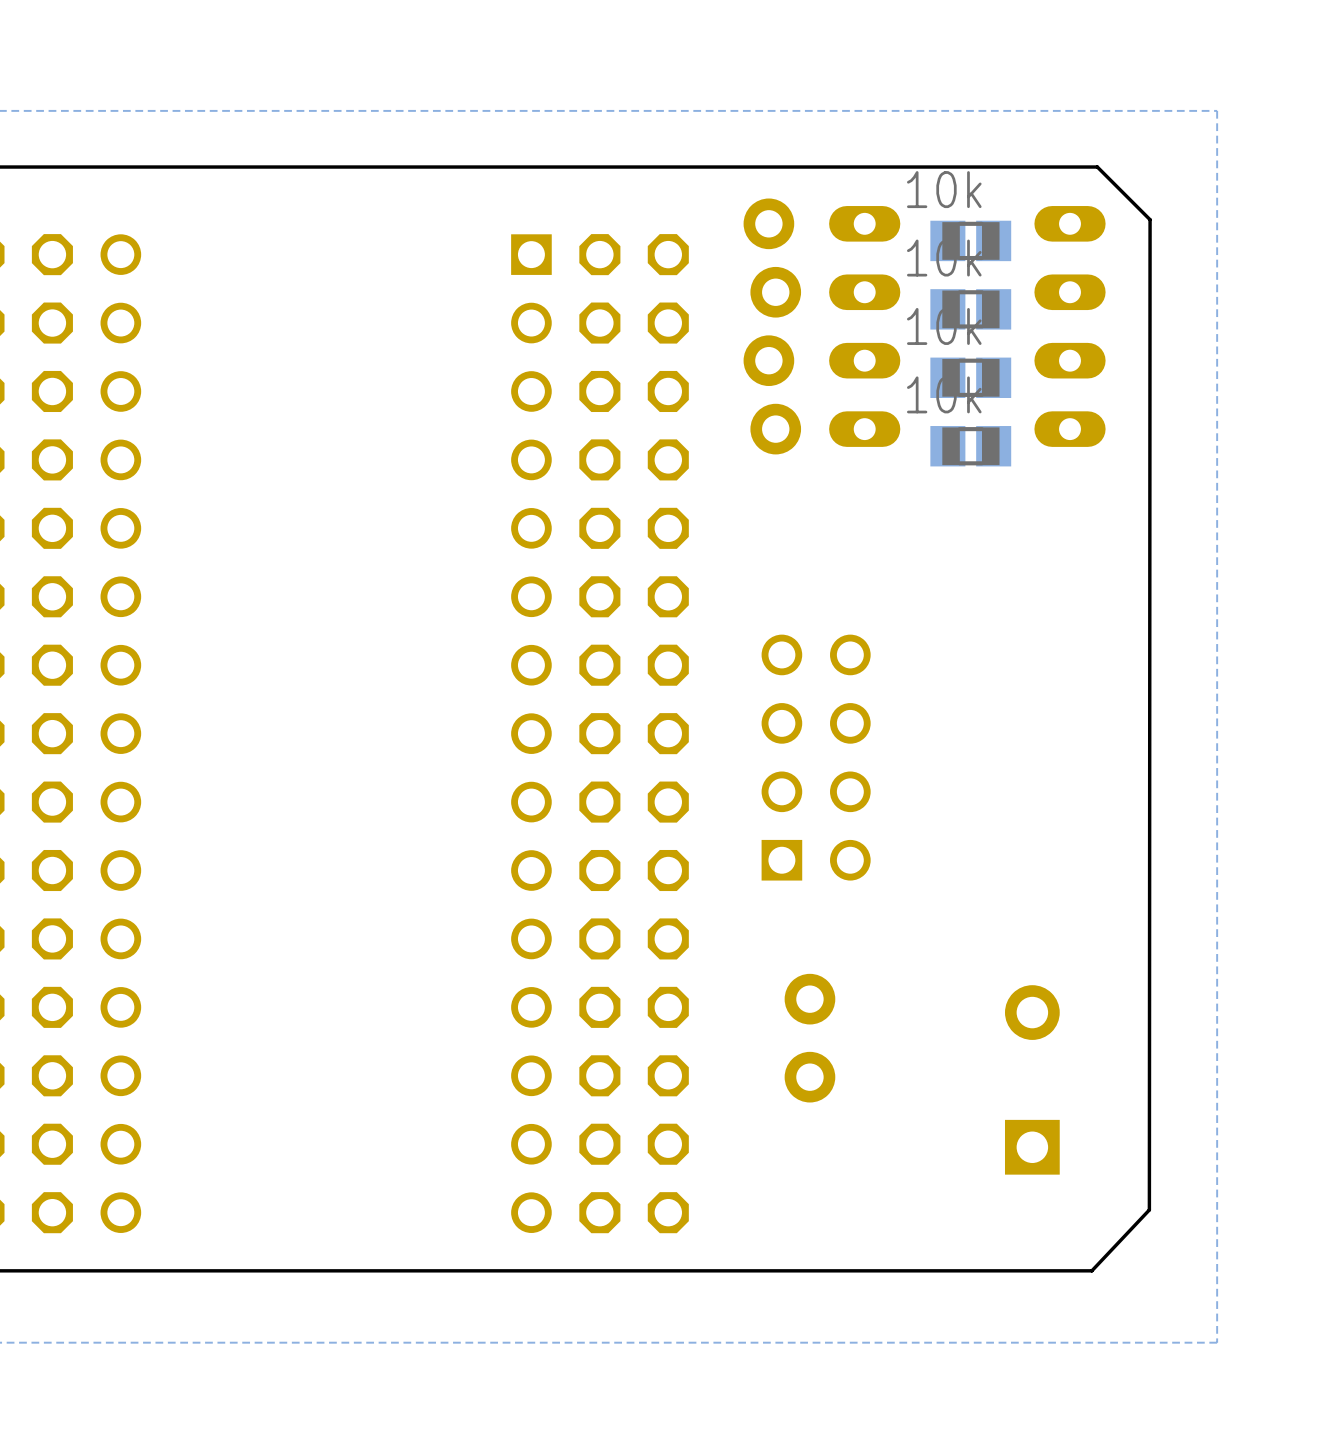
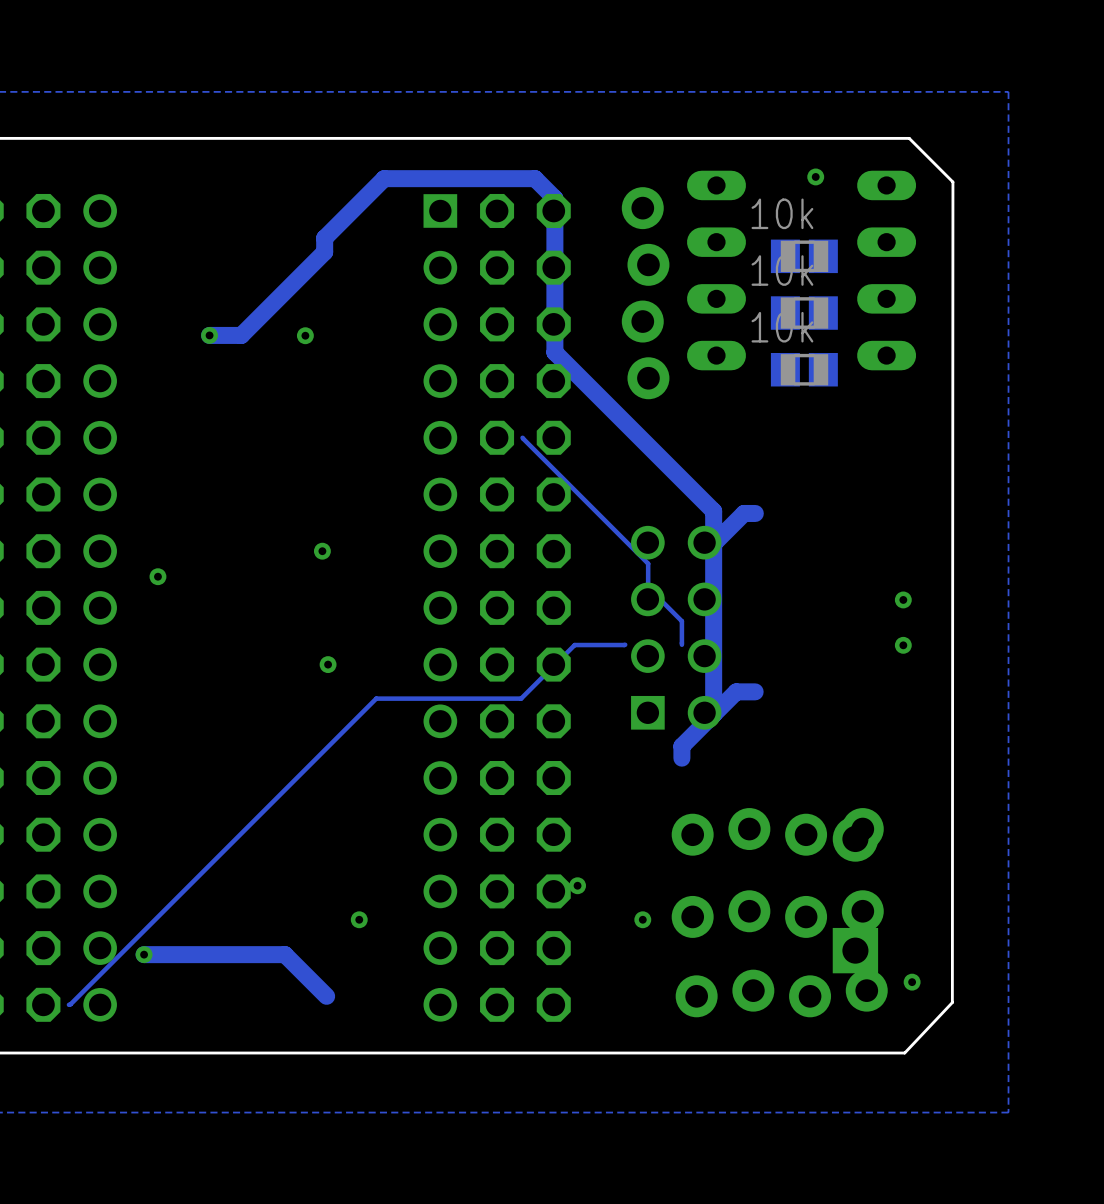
via: none -> (815, 176)
part: 10k (970, 240) -> none
part position: (772, 326) -> (645, 293)
track: none -> (209, 335) (241, 335) (324, 252) (324, 238) (384, 178) (535, 178) (554, 198) (554, 352) (713, 511) (713, 714)
via: none -> (209, 335)
via: none -> (305, 335)
track: none -> (522, 437) (648, 563) (648, 587) (681, 621) (681, 644)
track: none -> (755, 513) (744, 513) (713, 543)
via: none -> (322, 551)
via: none -> (157, 576)
via: none -> (903, 599)
track: none -> (625, 644) (574, 645) (521, 698) (376, 698) (68, 1004)
via: none -> (903, 645)
via: none -> (328, 664)
track: none -> (755, 691) (736, 691) (681, 746) (681, 758)
part: none -> (777, 831)
part: (809, 1038) -> none
via: none -> (577, 885)
part: none -> (777, 914)
via: none -> (359, 919)
via: none -> (642, 919)
track: none -> (144, 954) (284, 954) (326, 996)
via: none -> (144, 954)
via: none -> (912, 982)
part: none -> (781, 993)

